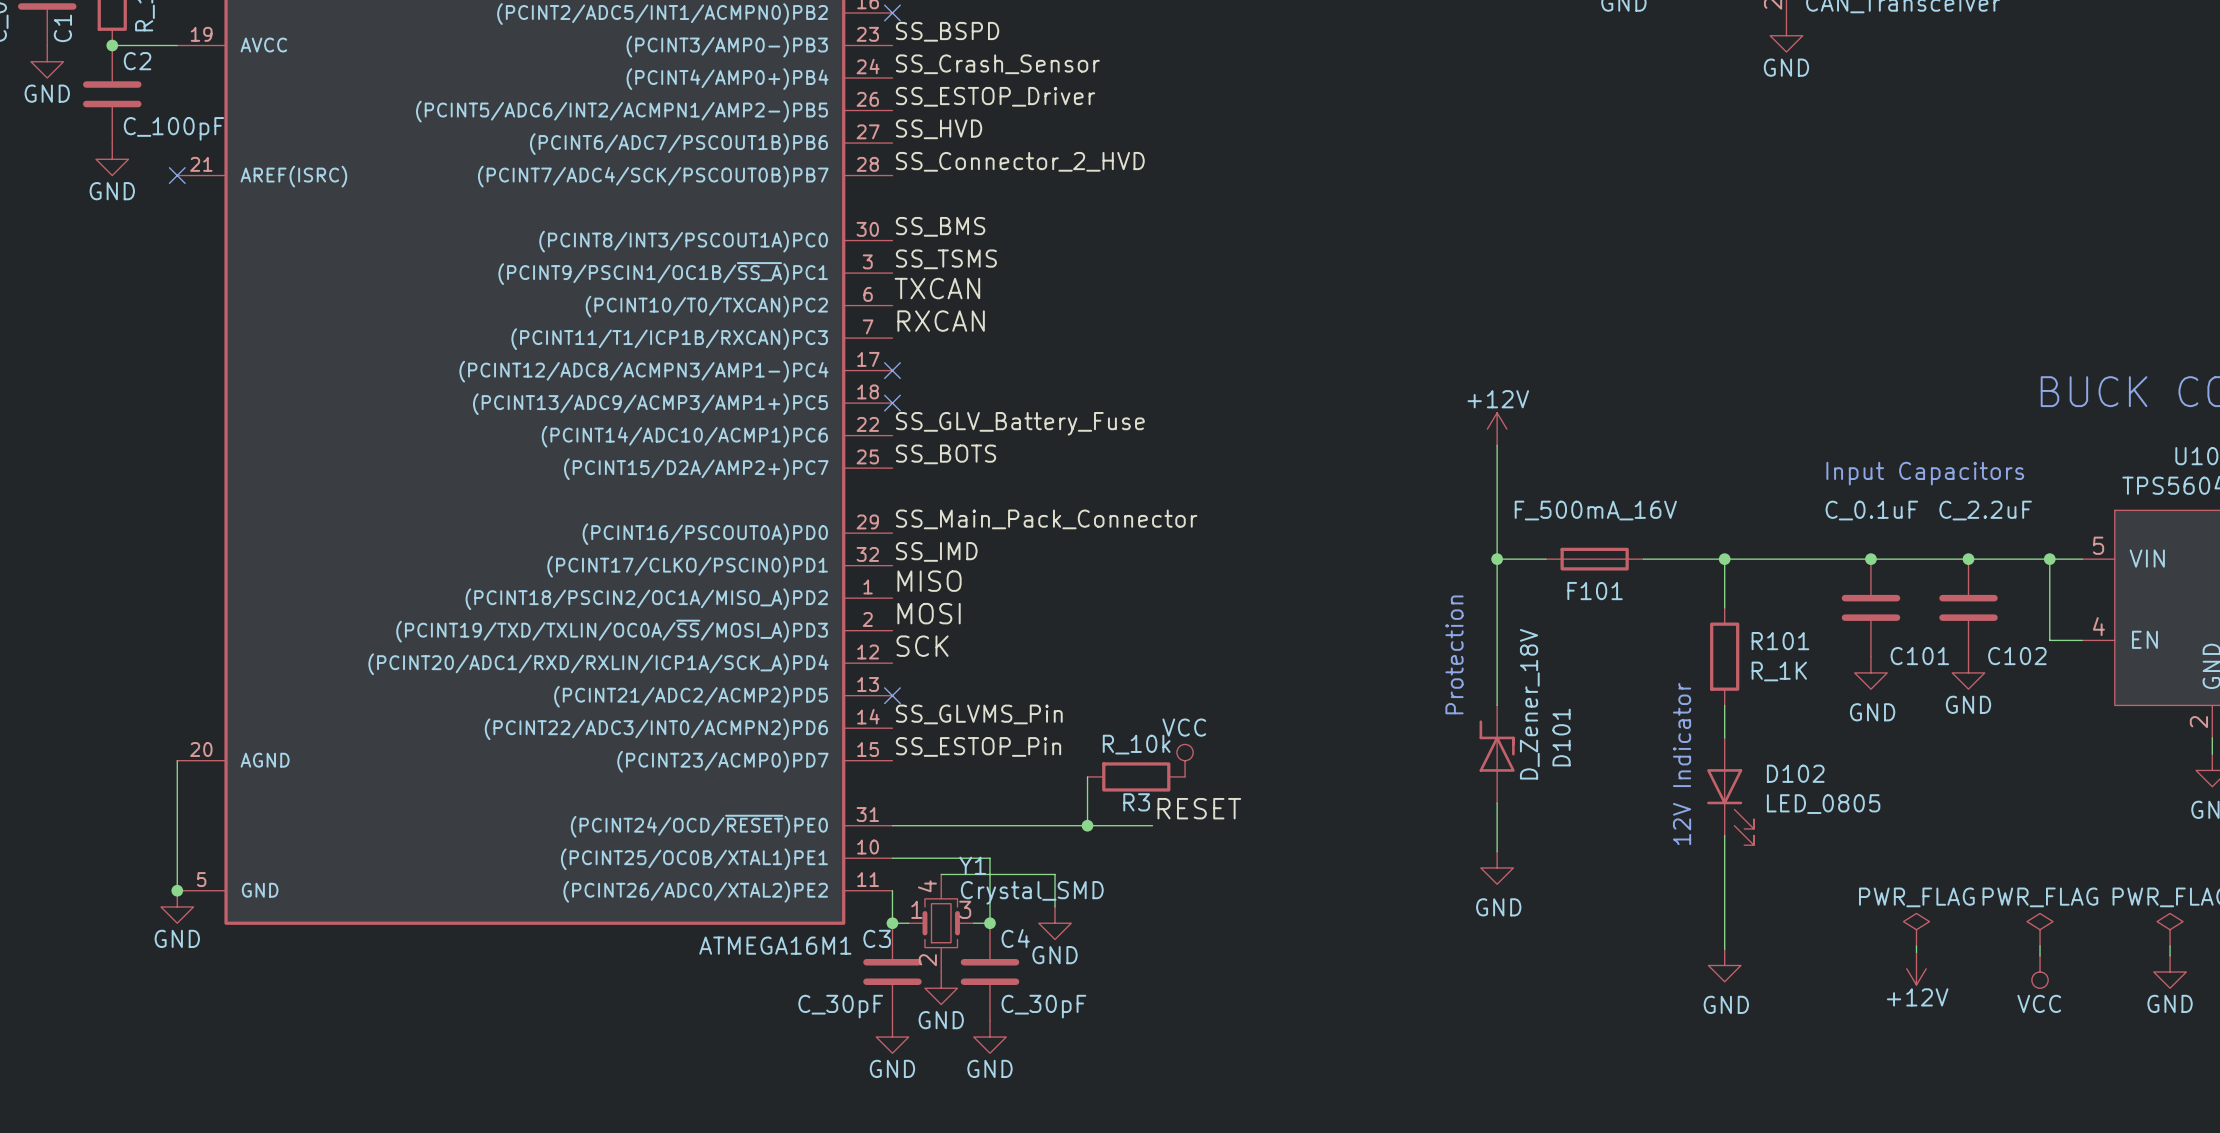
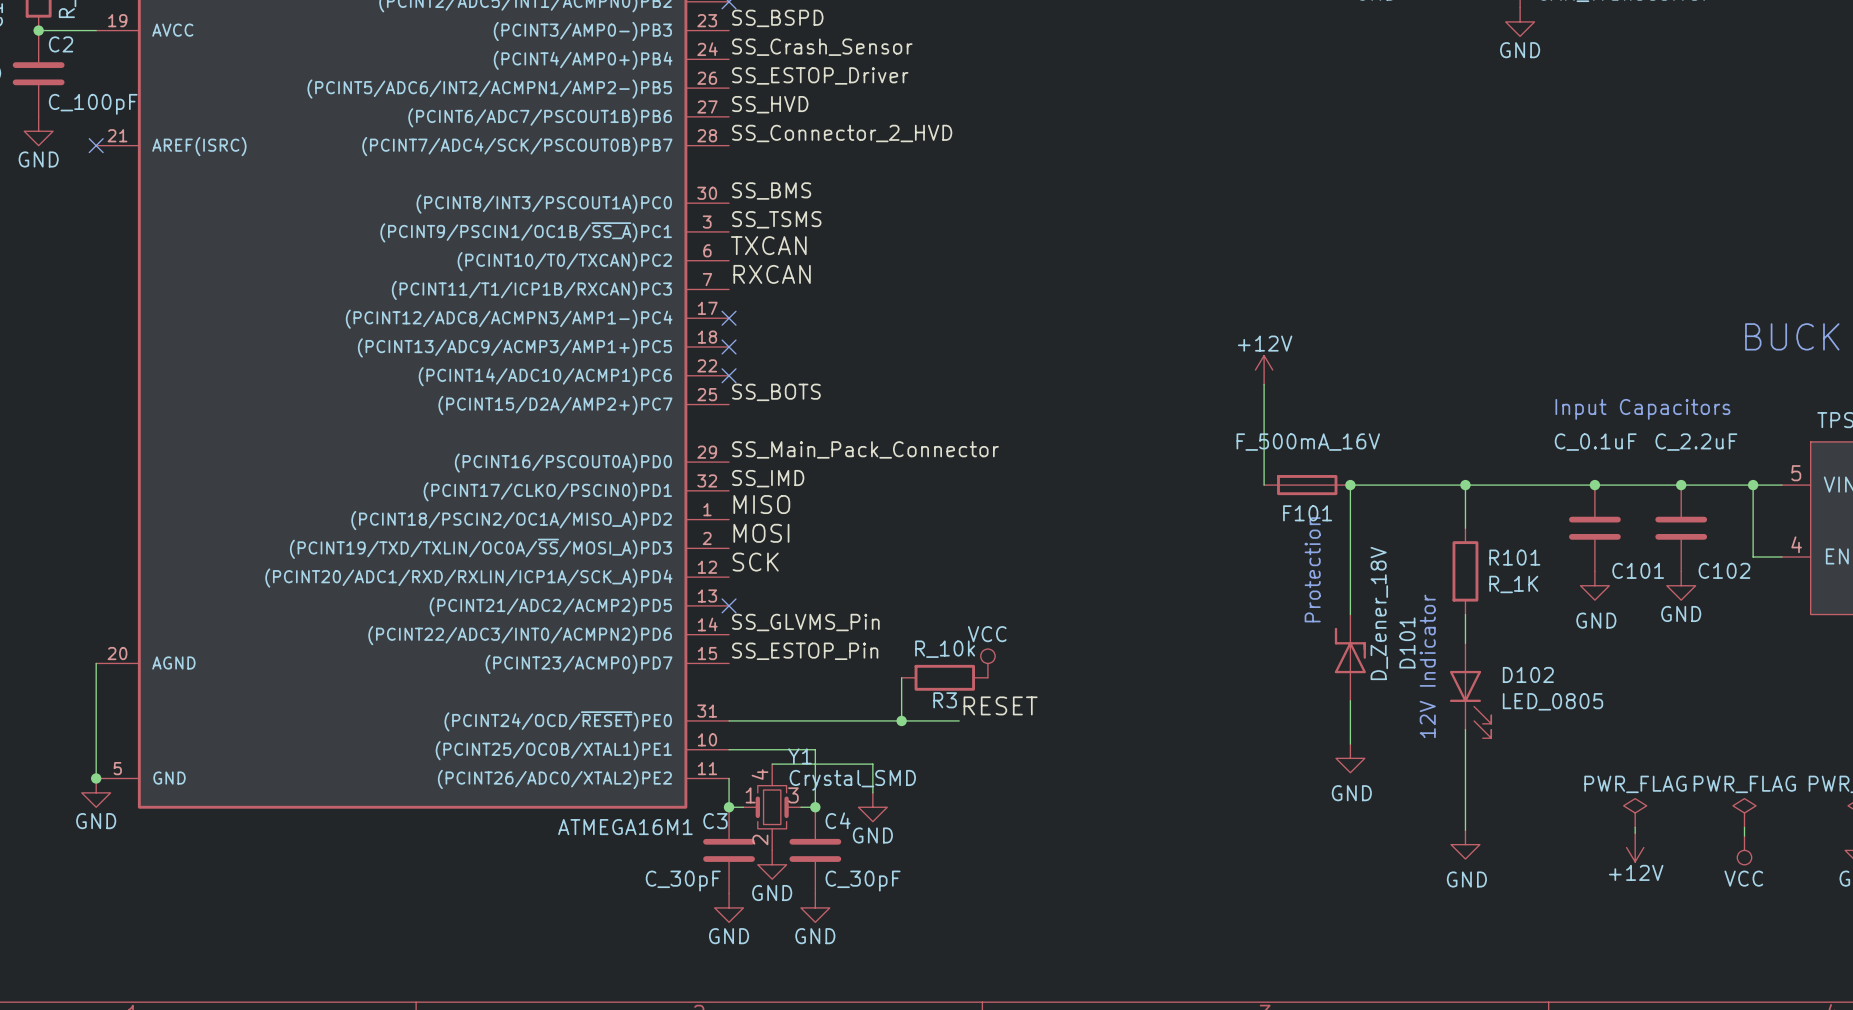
label: SS_GLV_Battery_Fuse (1020, 423) -> none
no-connect mark: none -> (729, 375)
junction: (1497, 559) -> none
wire: (1545, 559) (1497, 559) (1497, 705) -> (1393, 485) (1350, 485) (1350, 614)
F101 position: (1594, 559) -> (1307, 485)
junction: none -> (1350, 485)
text position: Protection (1454, 654) -> Protection (1312, 569)
D101 position: (1497, 754) -> (1350, 657)
wire: (1497, 802) (1497, 851) -> (1350, 700) (1350, 743)
power symbol position: GND (1497, 867) -> GND (1350, 758)

